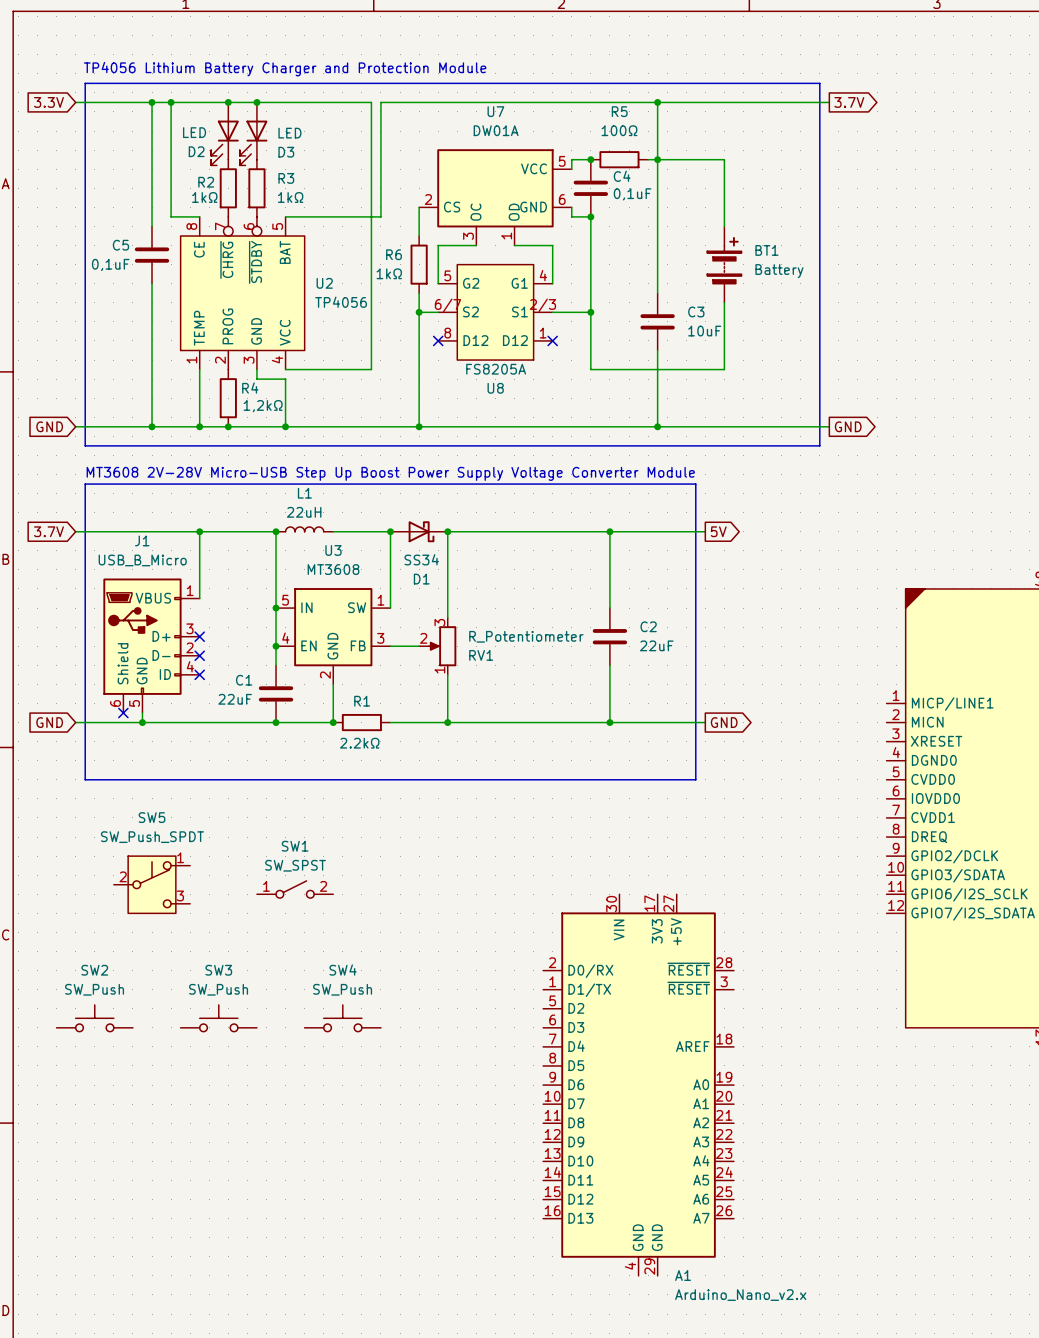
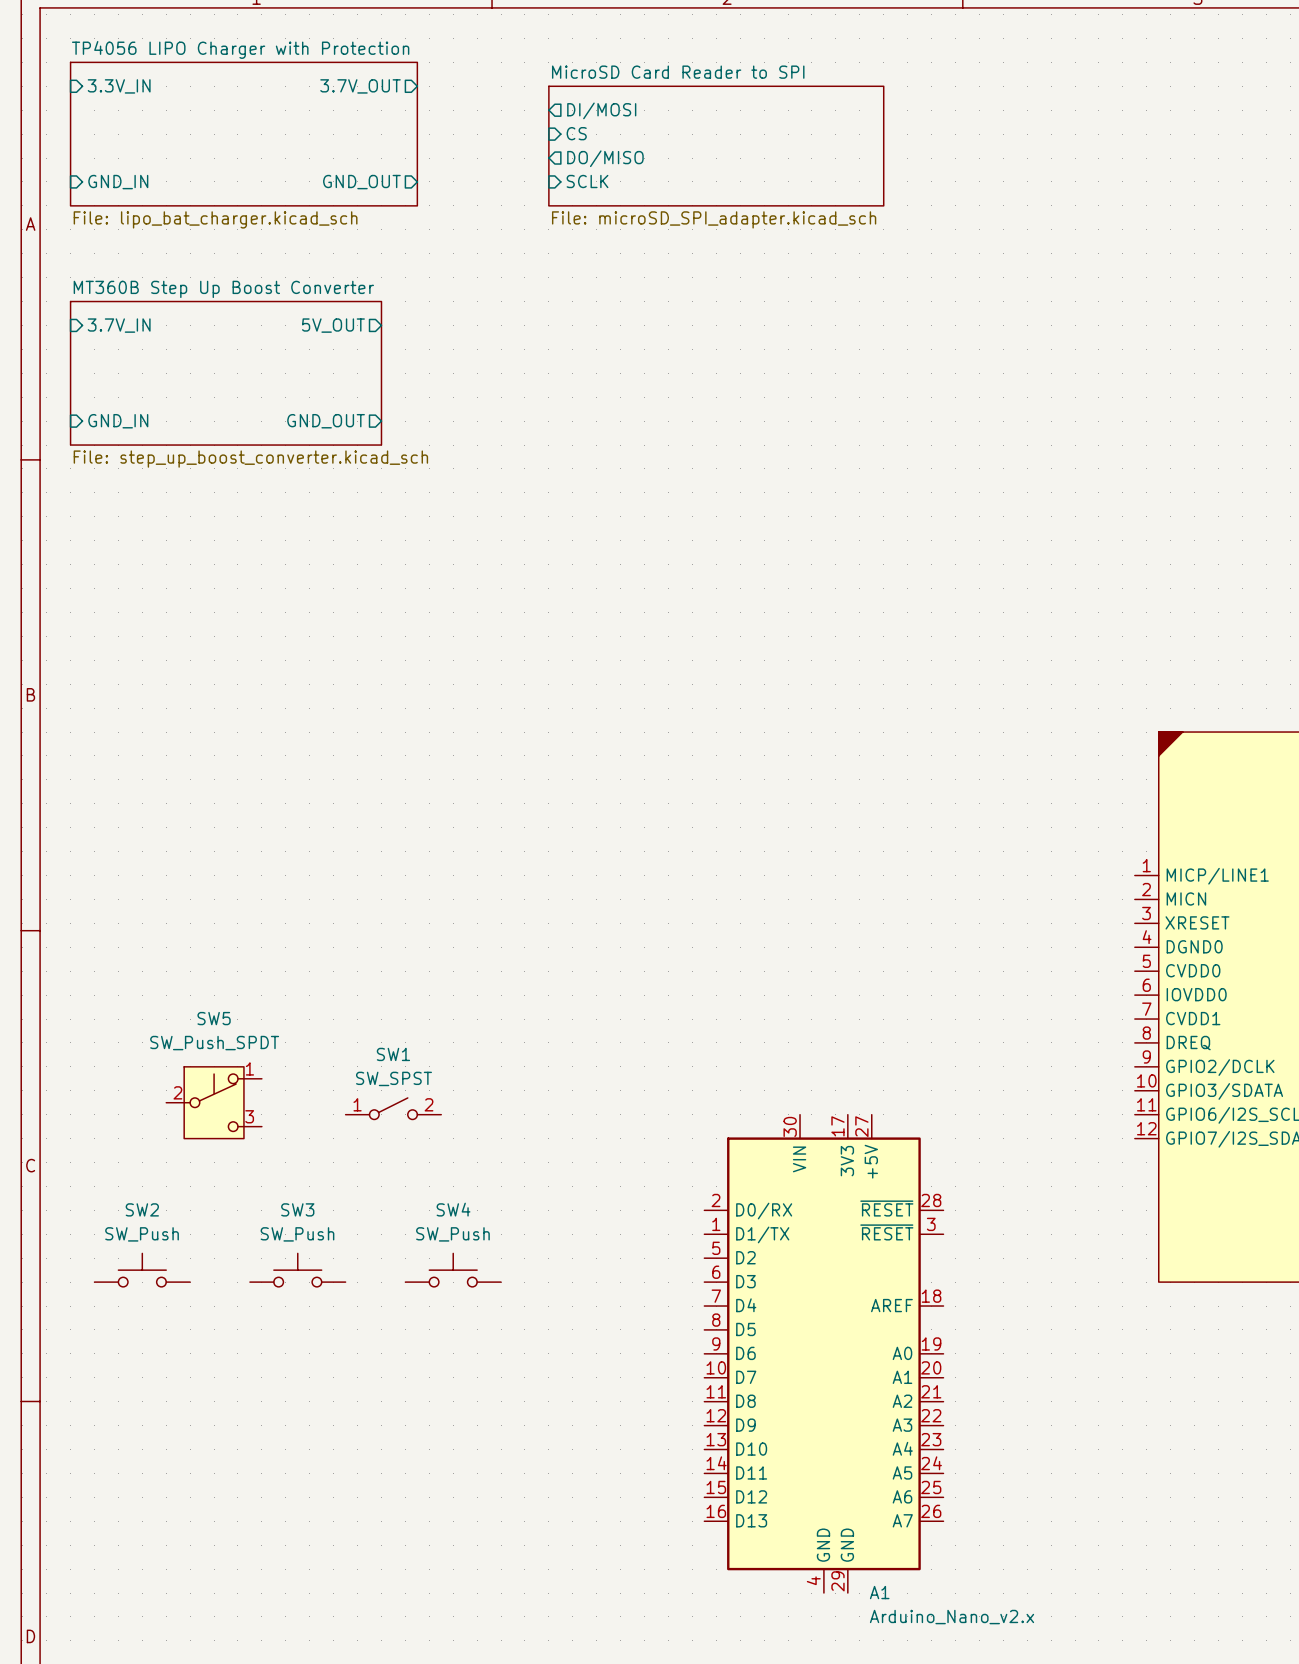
text: TP4056 Lithium Battery Charger and Protection Module (285, 69) -> none
sheet pin: none -> 3.3V_IN (119, 86)
sheet pin: none -> 3.7V_OUT (360, 86)
line: (85, 83) (819, 83) (819, 445) (85, 445) (85, 83) -> none
sheet pin: none -> DI/MOSI (601, 110)
global label: 3.3V (48, 102) -> none
wire: (75, 102) (371, 102) (371, 369) (285, 369) -> none
wire: (152, 102) (152, 226) -> none
junction: (152, 102) -> none
wire: (171, 102) (171, 216) (199, 216) -> none
junction: (171, 102) -> none
junction: (228, 102) -> none
junction: (256, 102) -> none
wire: (657, 102) (657, 293) -> none
junction: (657, 102) -> none
wire: (829, 102) (380, 102) (380, 216) (285, 216) -> none
global label: 3.7V (849, 102) -> none
sheet TP4056 LIPO Charger with Protection: none -> File: lipo_bat_charger.kicad_sch (243, 134)
sheet pin: none -> CS (576, 133)
sheet MicroSD Card Reader to SPI: none -> File: microSD_SPI_adapter.kicad_sch (716, 146)
sheet pin: none -> DO/MISO (605, 158)
D2: LED (224, 133) -> none
D3: LED (253, 133) -> none
sheet pin: none -> SCLK (587, 181)
sheet pin: none -> GND_IN (118, 182)
sheet pin: none -> GND_OUT (361, 182)
wire: (590, 159) (571, 159) (571, 169) -> none
junction: (590, 159) -> none
R5: 100Ω (619, 159) -> none
wire: (648, 159) (724, 159) (724, 226) -> none
junction: (657, 159) -> none
R2: 1kΩ (228, 188) -> none
R3: 1kΩ (256, 188) -> none
C4: 0,1uF (590, 188) -> none
U7: DW01A (495, 197) -> none
wire: (419, 207) (419, 236) -> none
wire: (571, 207) (571, 216) (590, 216) (590, 369) (724, 369) (724, 302) -> none
junction: (590, 216) -> none
wire: (476, 245) (438, 245) (438, 283) -> none
wire: (514, 245) (552, 245) (552, 283) -> none
C5: 0,1uF (152, 255) -> none
sheet pin: none -> 3.7V_IN (119, 325)
sheet pin: none -> 5V_OUT (333, 325)
R6: 1kΩ (419, 264) -> none
BT1: Battery (724, 264) -> none
wire: (152, 283) (152, 426) -> none
U2: TP4056 (242, 293) -> none
wire: (419, 293) (419, 426) -> none
sheet MT360B Step Up Boost Converter: none -> File: step_up_boost_converter.kicad_sch (226, 373)
wire: (419, 312) (438, 312) -> none
junction: (419, 312) -> none
U8: FS8205A (495, 312) -> none
wire: (552, 312) (590, 312) -> none
junction: (590, 312) -> none
C3: 10uF (657, 321) -> none
no-connect mark: (438, 340) -> none
no-connect mark: (552, 340) -> none
sheet pin: none -> GND_IN (118, 421)
sheet pin: none -> GND_OUT (326, 421)
wire: (657, 350) (657, 426) -> none
wire: (199, 369) (199, 426) -> none
wire: (256, 369) (256, 379) (285, 379) (285, 426) -> none
R4: 1,2kΩ (228, 398) -> none
global label: GND (49, 426) -> none
wire: (75, 426) (829, 426) -> none
junction: (152, 426) -> none
junction: (199, 426) -> none
junction: (228, 426) -> none
junction: (285, 426) -> none
junction: (419, 426) -> none
junction: (657, 426) -> none
global label: GND (848, 426) -> none
text: MT3608 2V-28V Micro-USB Step Up Boost Power Supply Voltage Converter Module (390, 473) -> none
line: (85, 484) (85, 779) (695, 779) (695, 484) (85, 484) -> none
L1: 22uH (304, 529) -> none
global label: 3.7V (48, 531) -> none
wire: (75, 531) (276, 531) (276, 665) -> none
wire: (199, 531) (199, 598) -> none
junction: (199, 531) -> none
junction: (276, 531) -> none
wire: (333, 531) (390, 531) (390, 608) -> none
junction: (390, 531) -> none
D1: SS34 (419, 531) -> none
junction: (447, 531) -> none
wire: (609, 531) (609, 608) -> none
junction: (609, 531) -> none
wire: (705, 531) (447, 531) (447, 617) -> none
global label: 5V (718, 531) -> none
junction: (276, 608) -> none
no-connect mark: (199, 636) -> none
U3: MT3608 (333, 636) -> none
C2: 22uF (609, 636) -> none
J1: USB_B_Micro (151, 645) -> none
junction: (276, 646) -> none
wire: (390, 646) (419, 646) -> none
RV1: R_Potentiometer (437, 646) -> none
no-connect mark: (199, 655) -> none
wire: (609, 665) (609, 722) -> none
no-connect mark: (199, 674) -> none
wire: (447, 674) (447, 722) -> none
wire: (333, 684) (333, 722) (75, 722) -> none
C1: 22uF (276, 693) -> none
no-connect mark: (123, 713) -> none
wire: (142, 713) (142, 722) -> none
global label: GND (49, 722) -> none
junction: (142, 722) -> none
junction: (276, 722) -> none
junction: (333, 722) -> none
R1: 2.2kΩ (361, 722) -> none
wire: (390, 722) (705, 722) -> none
junction: (447, 722) -> none
junction: (609, 722) -> none
global label: GND (724, 722) -> none

